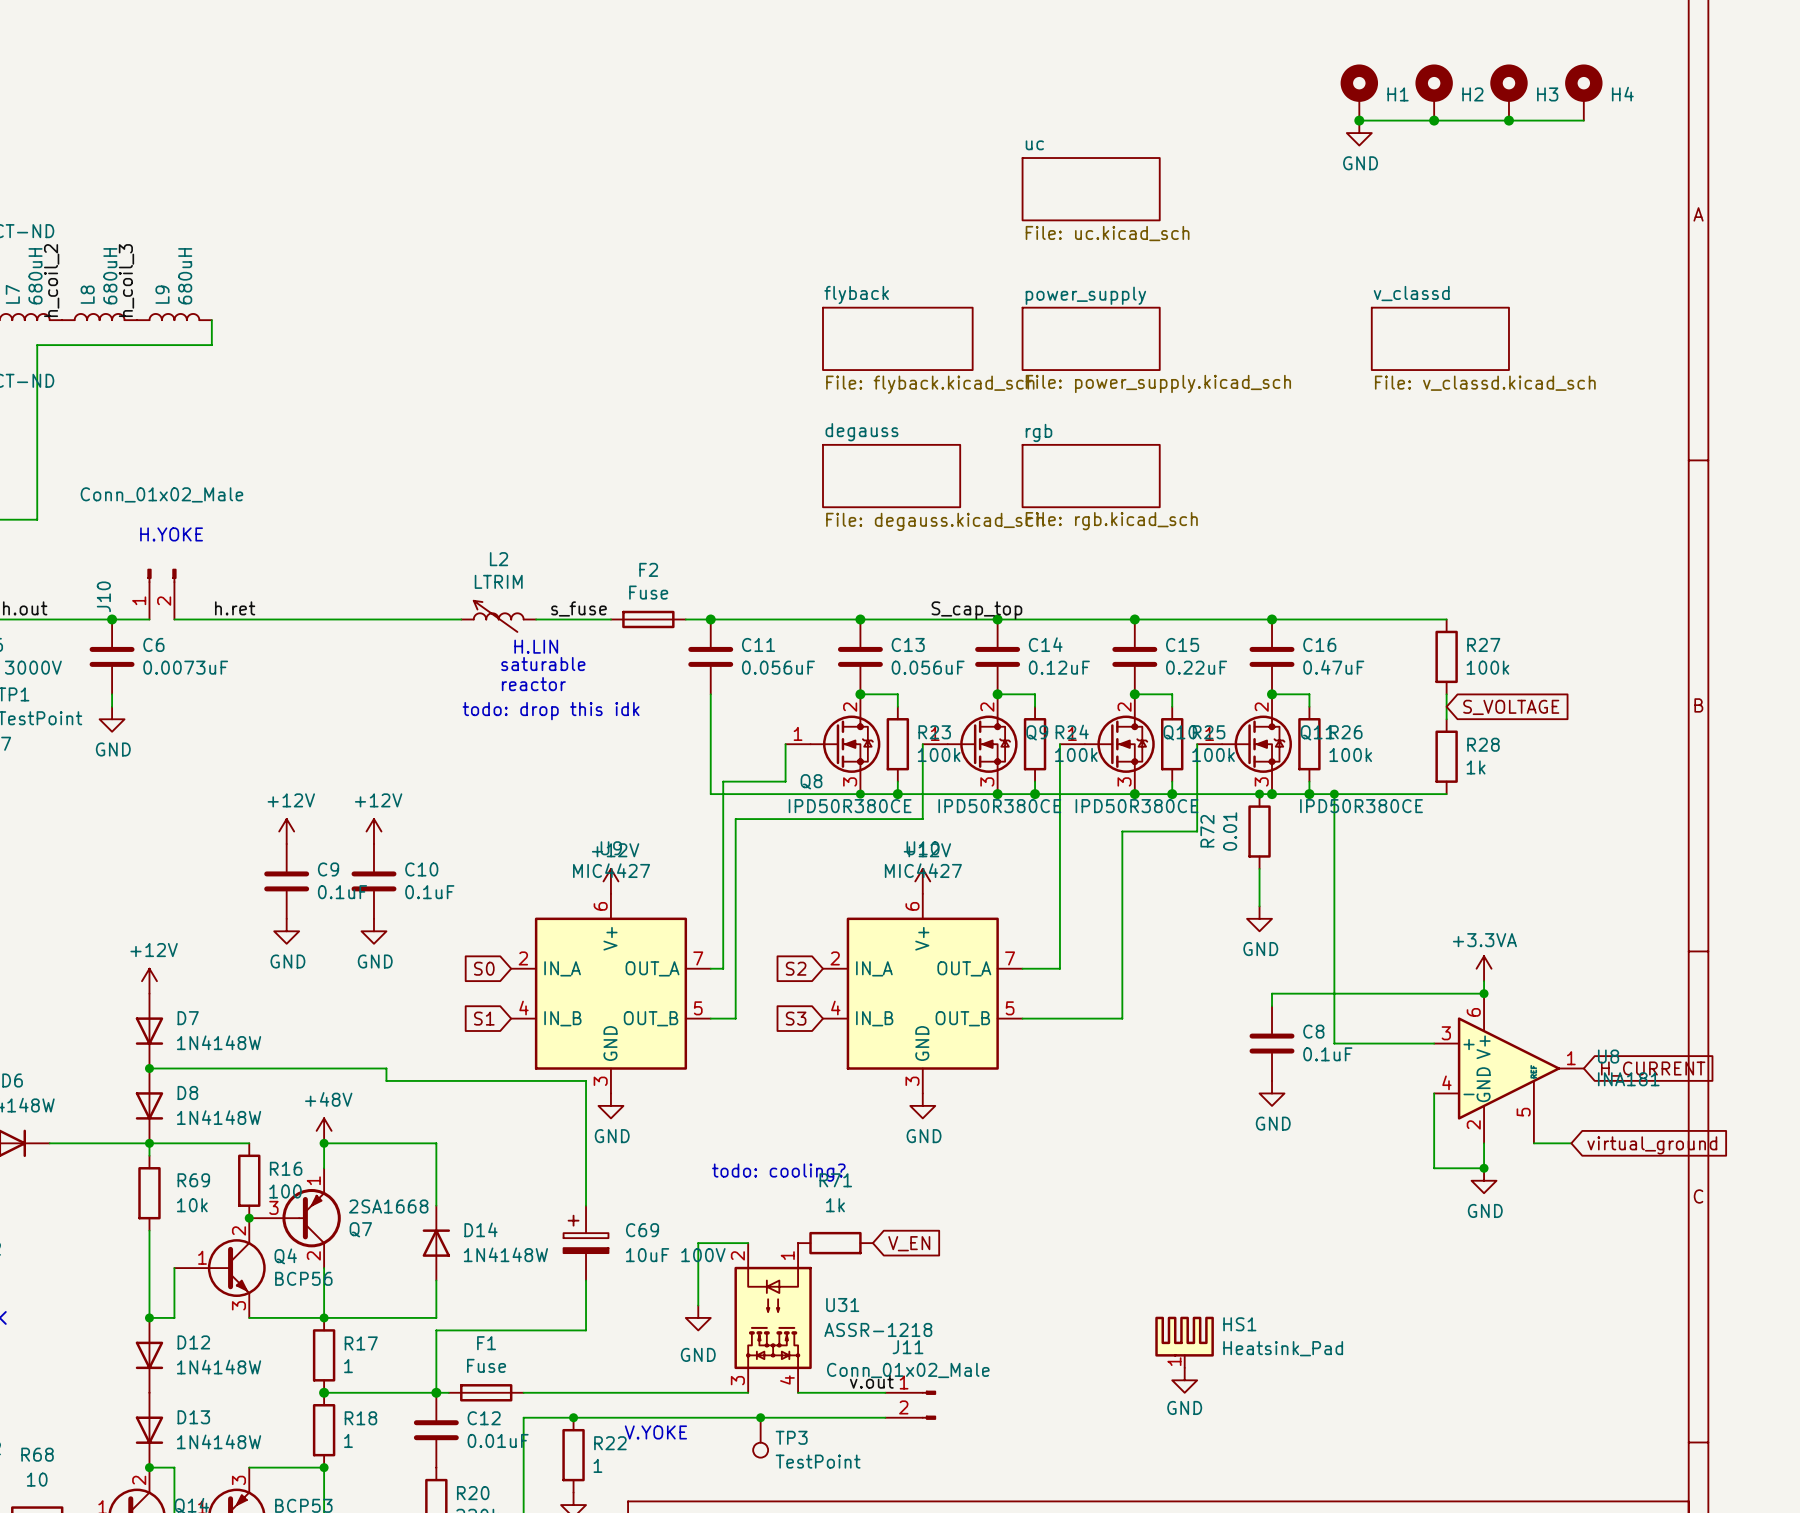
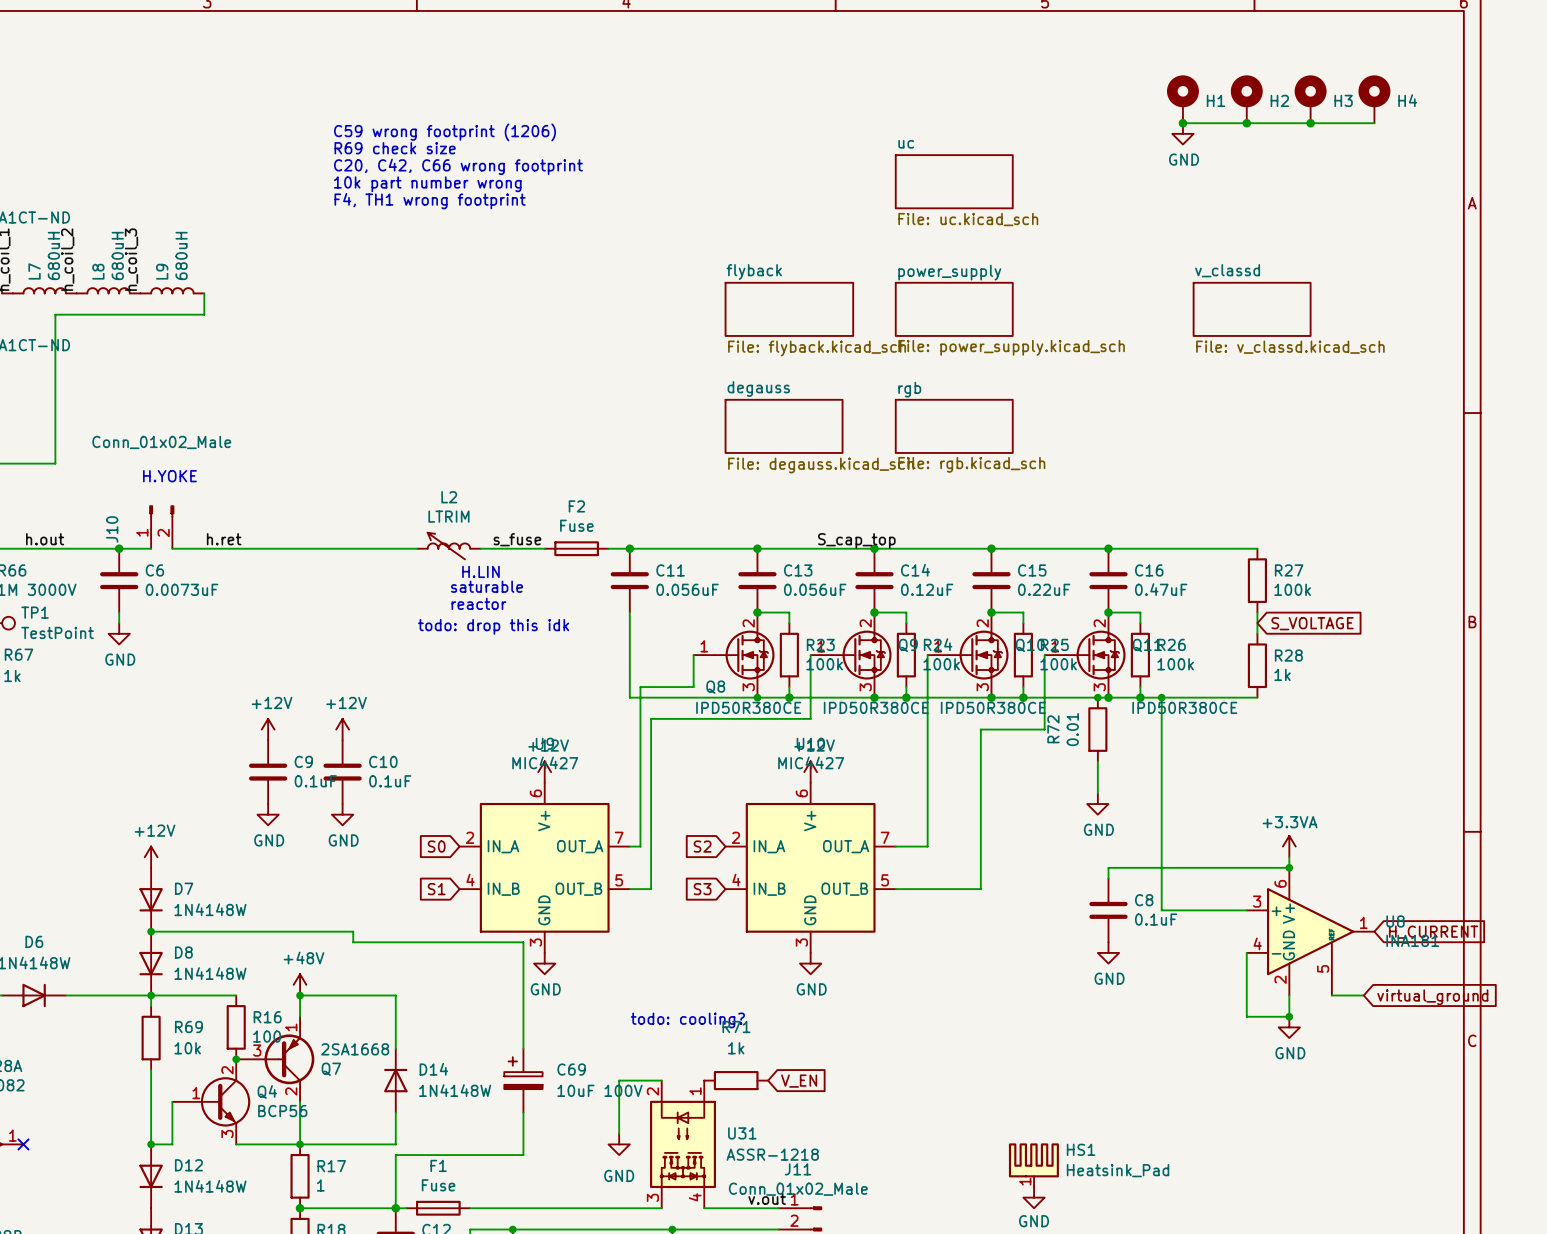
text: none -> C59 wrong footprint (1206) (444, 132)
text: none -> R69 check size (395, 148)
text: none -> C20, C42, C66 wrong footprint (458, 166)
text: none -> 10k part number wrong (427, 184)
text: none -> F4, TH1 wrong footprint (430, 201)

